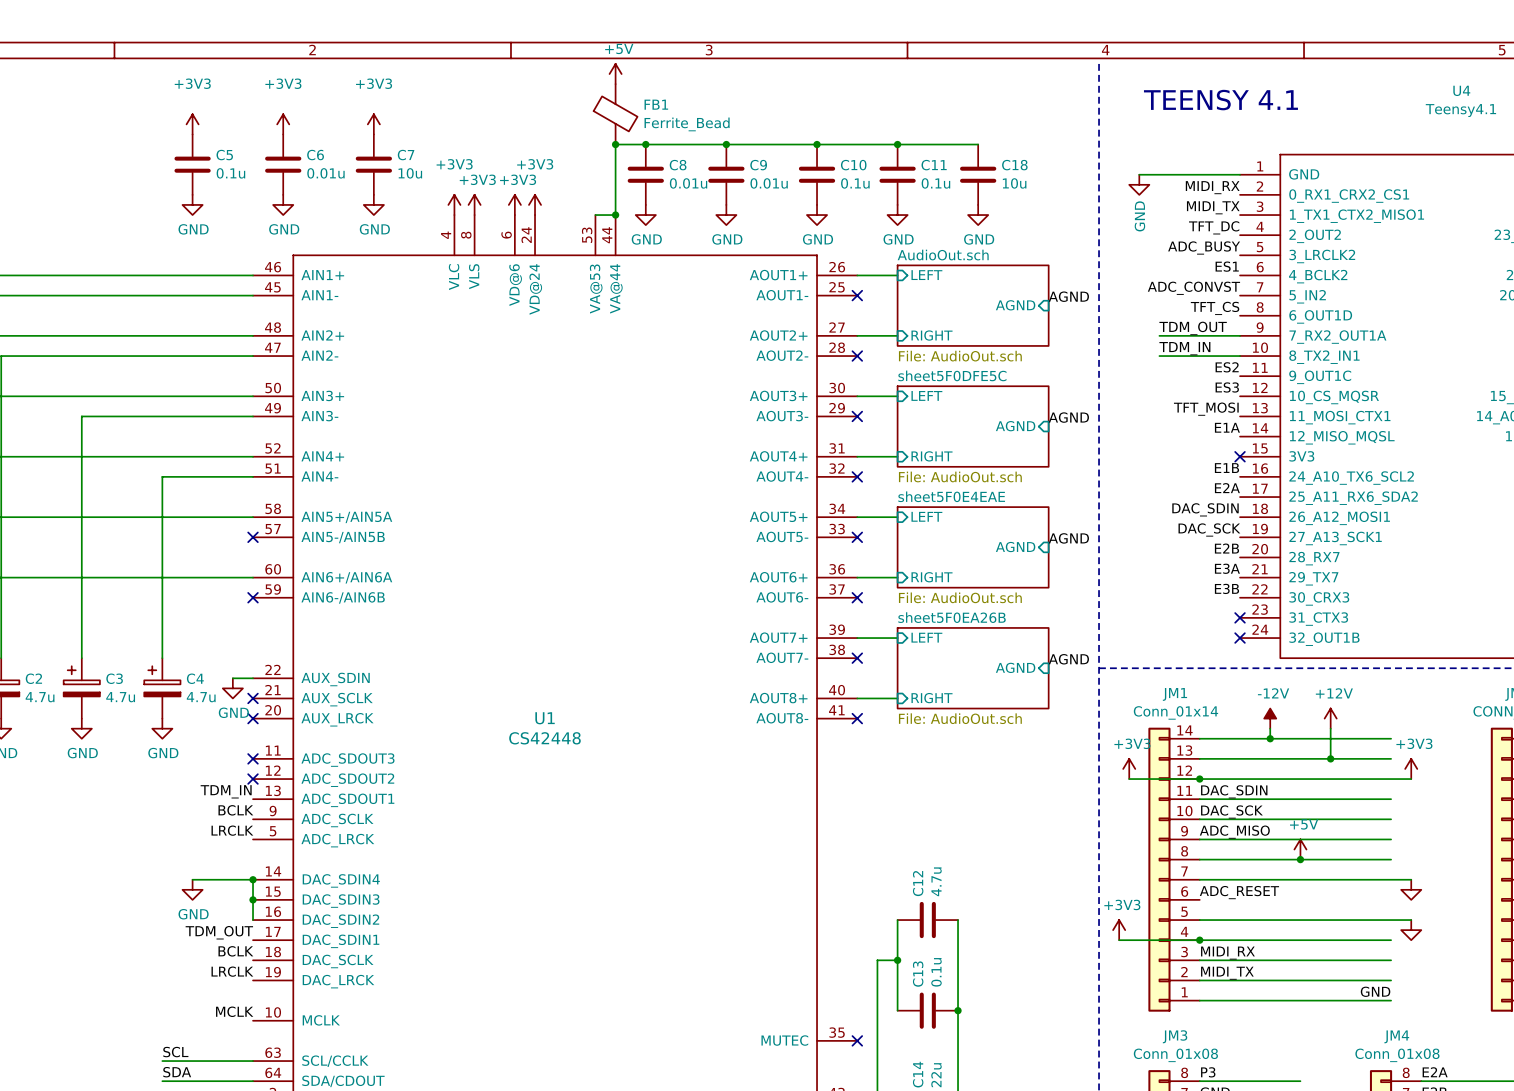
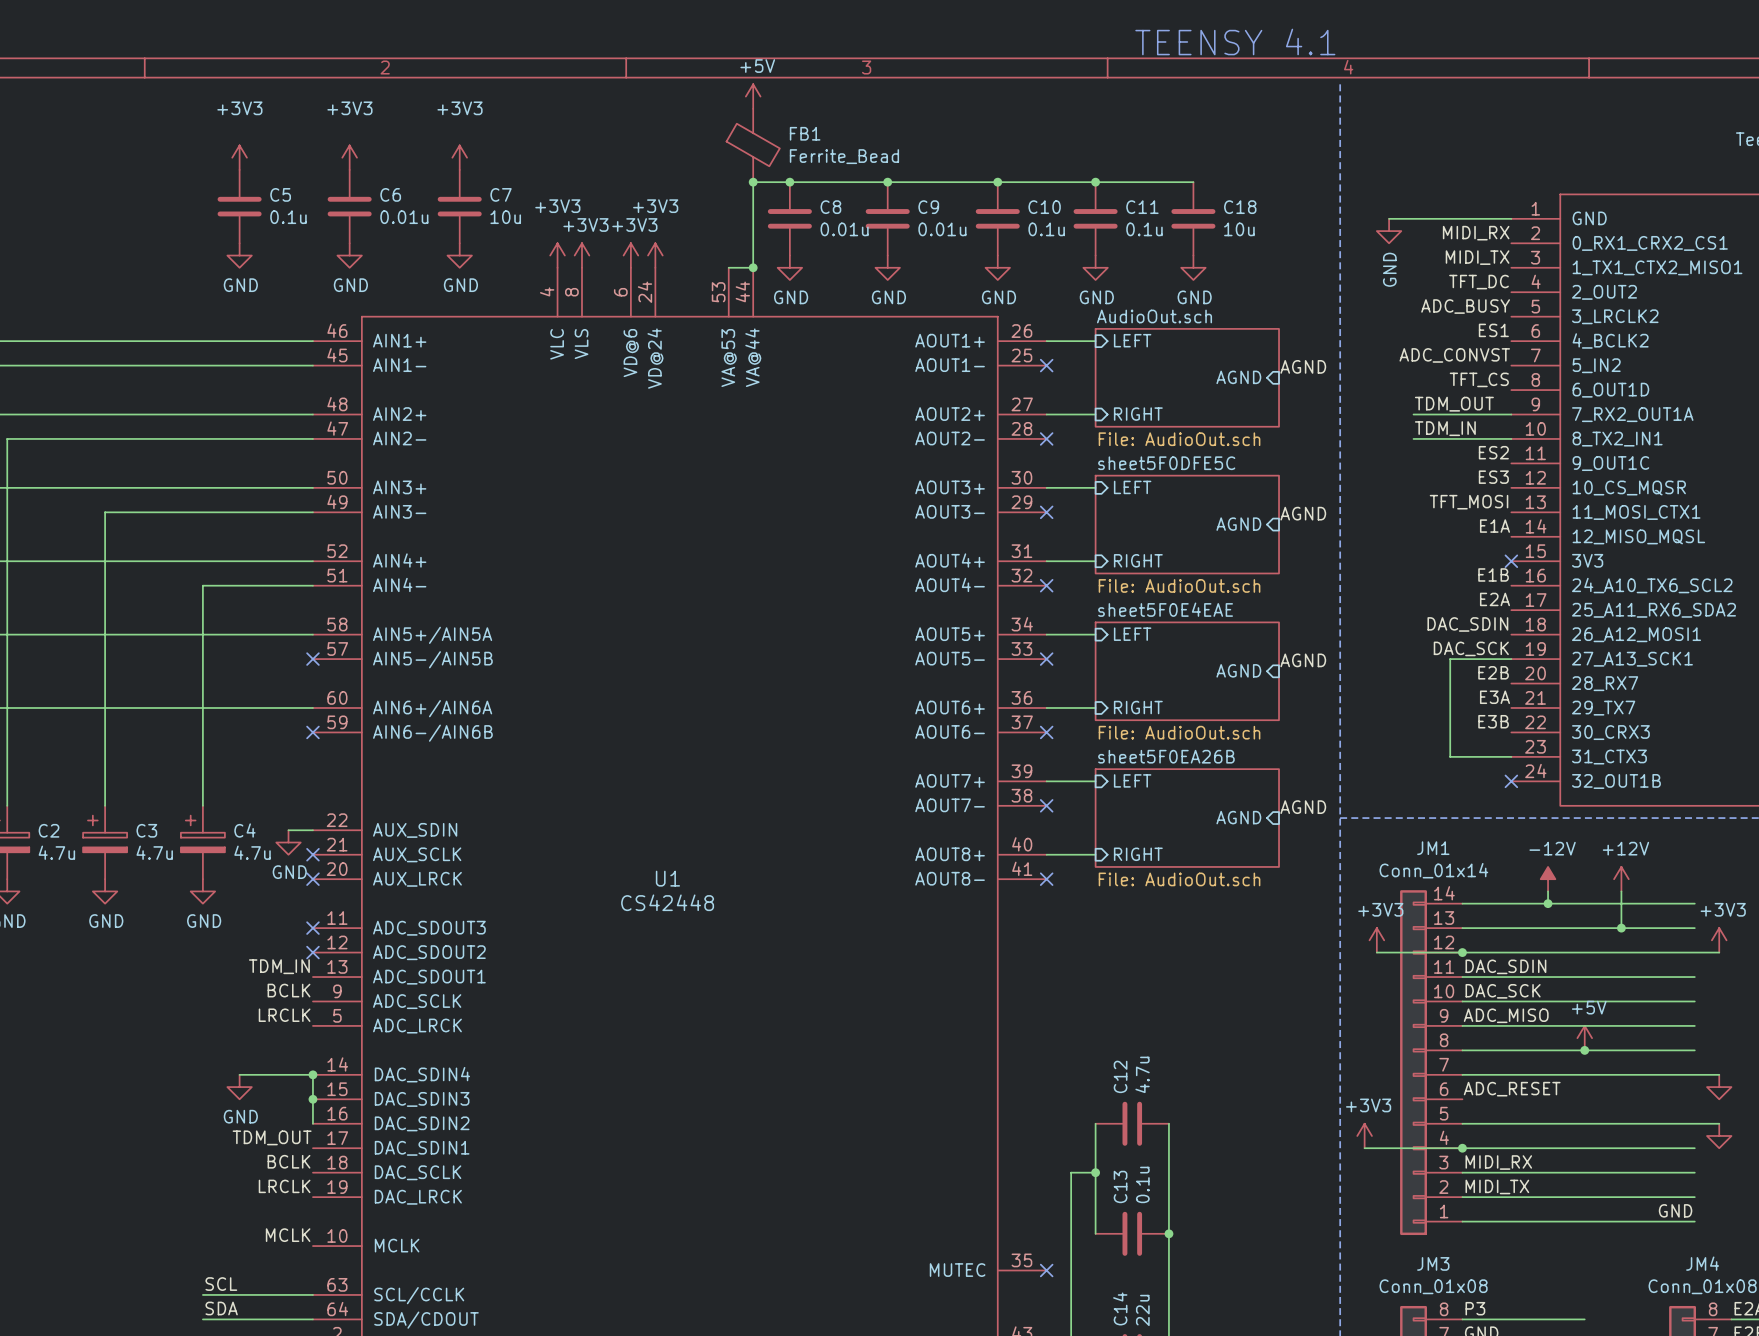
text: none -> TEENSY 4.1 (1235, 41)
text: TEENSY 4.1 (1220, 100) -> none
wire: none -> (1511, 659) (1450, 659) (1450, 756) (1511, 756)
no-connect mark: (1240, 617) -> none

